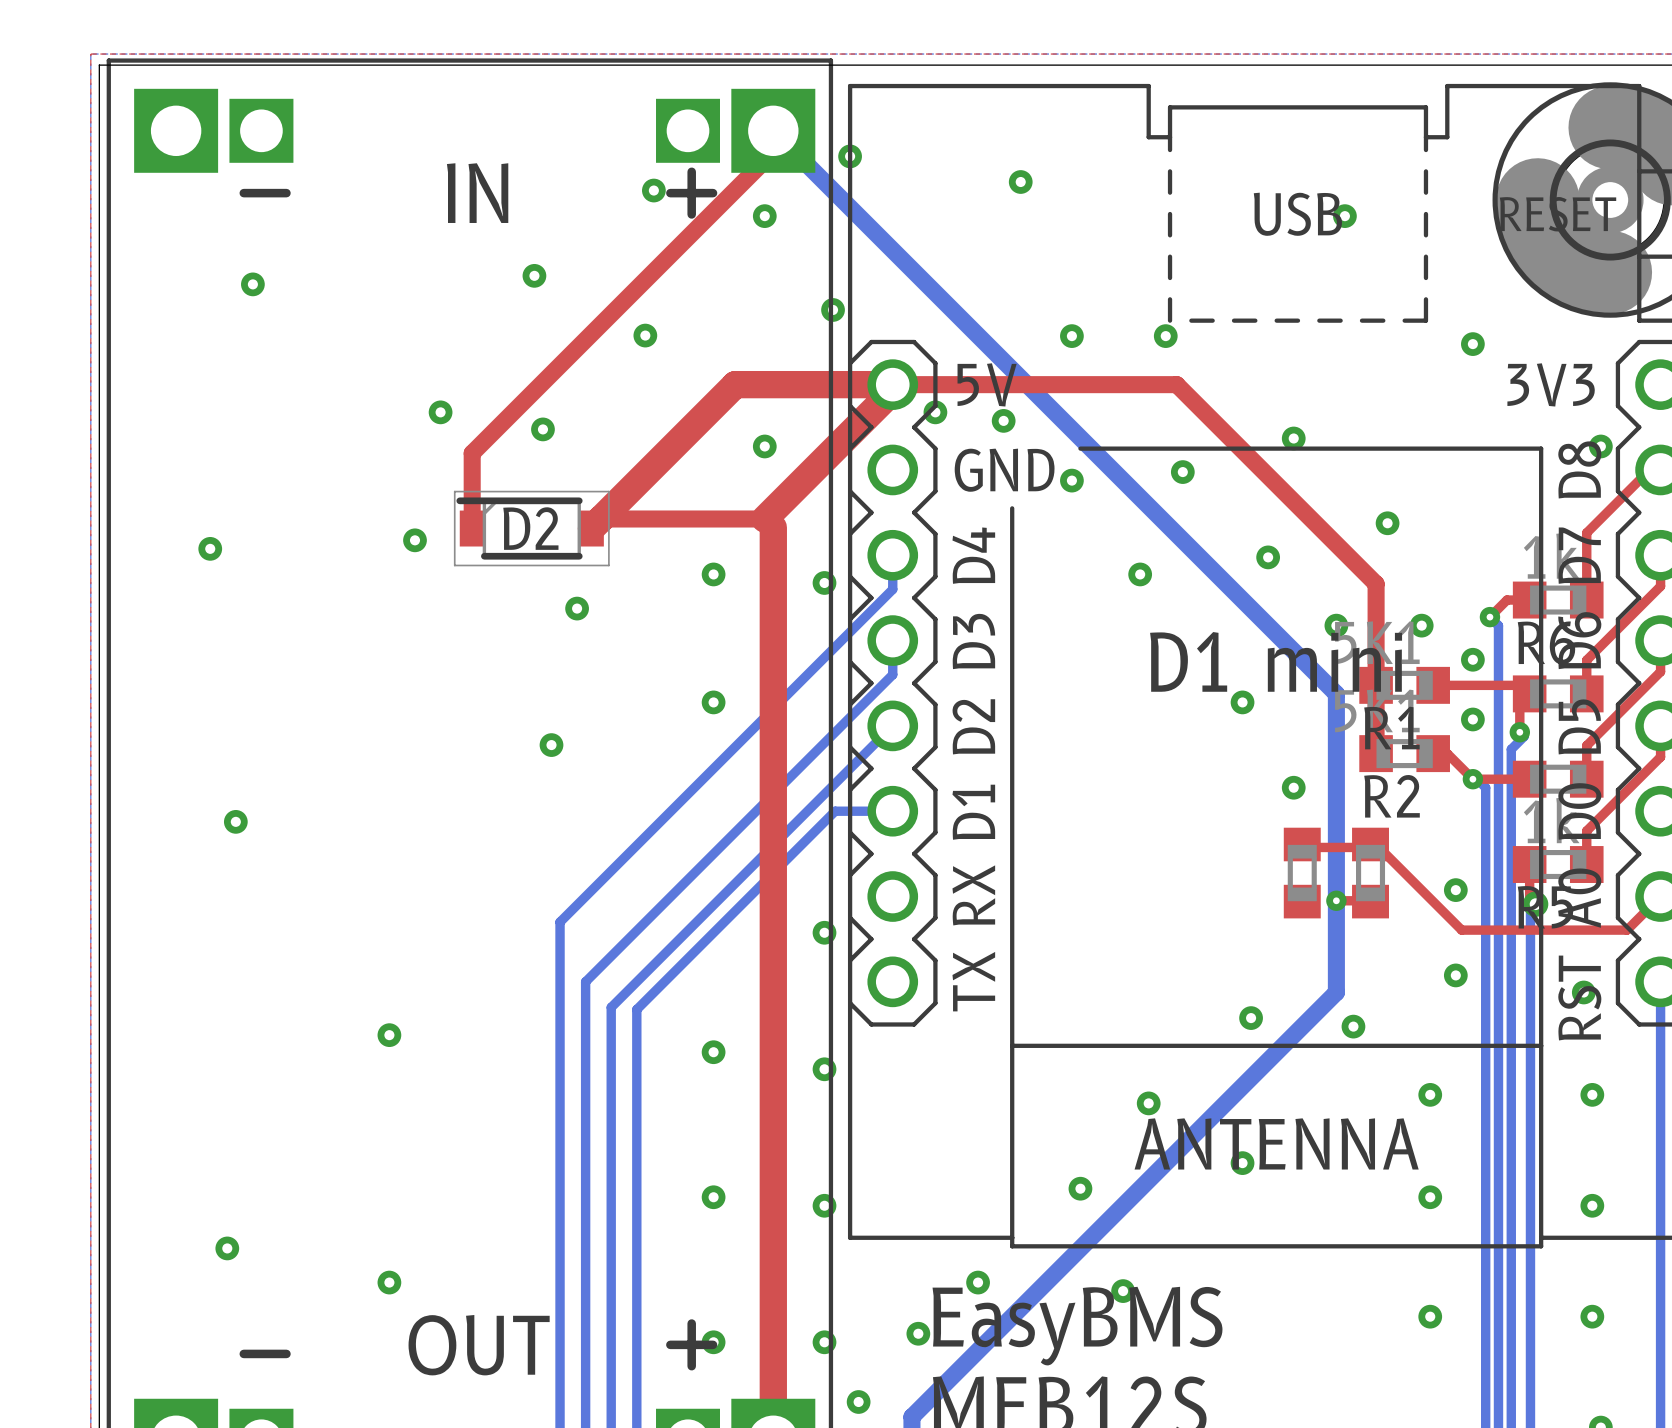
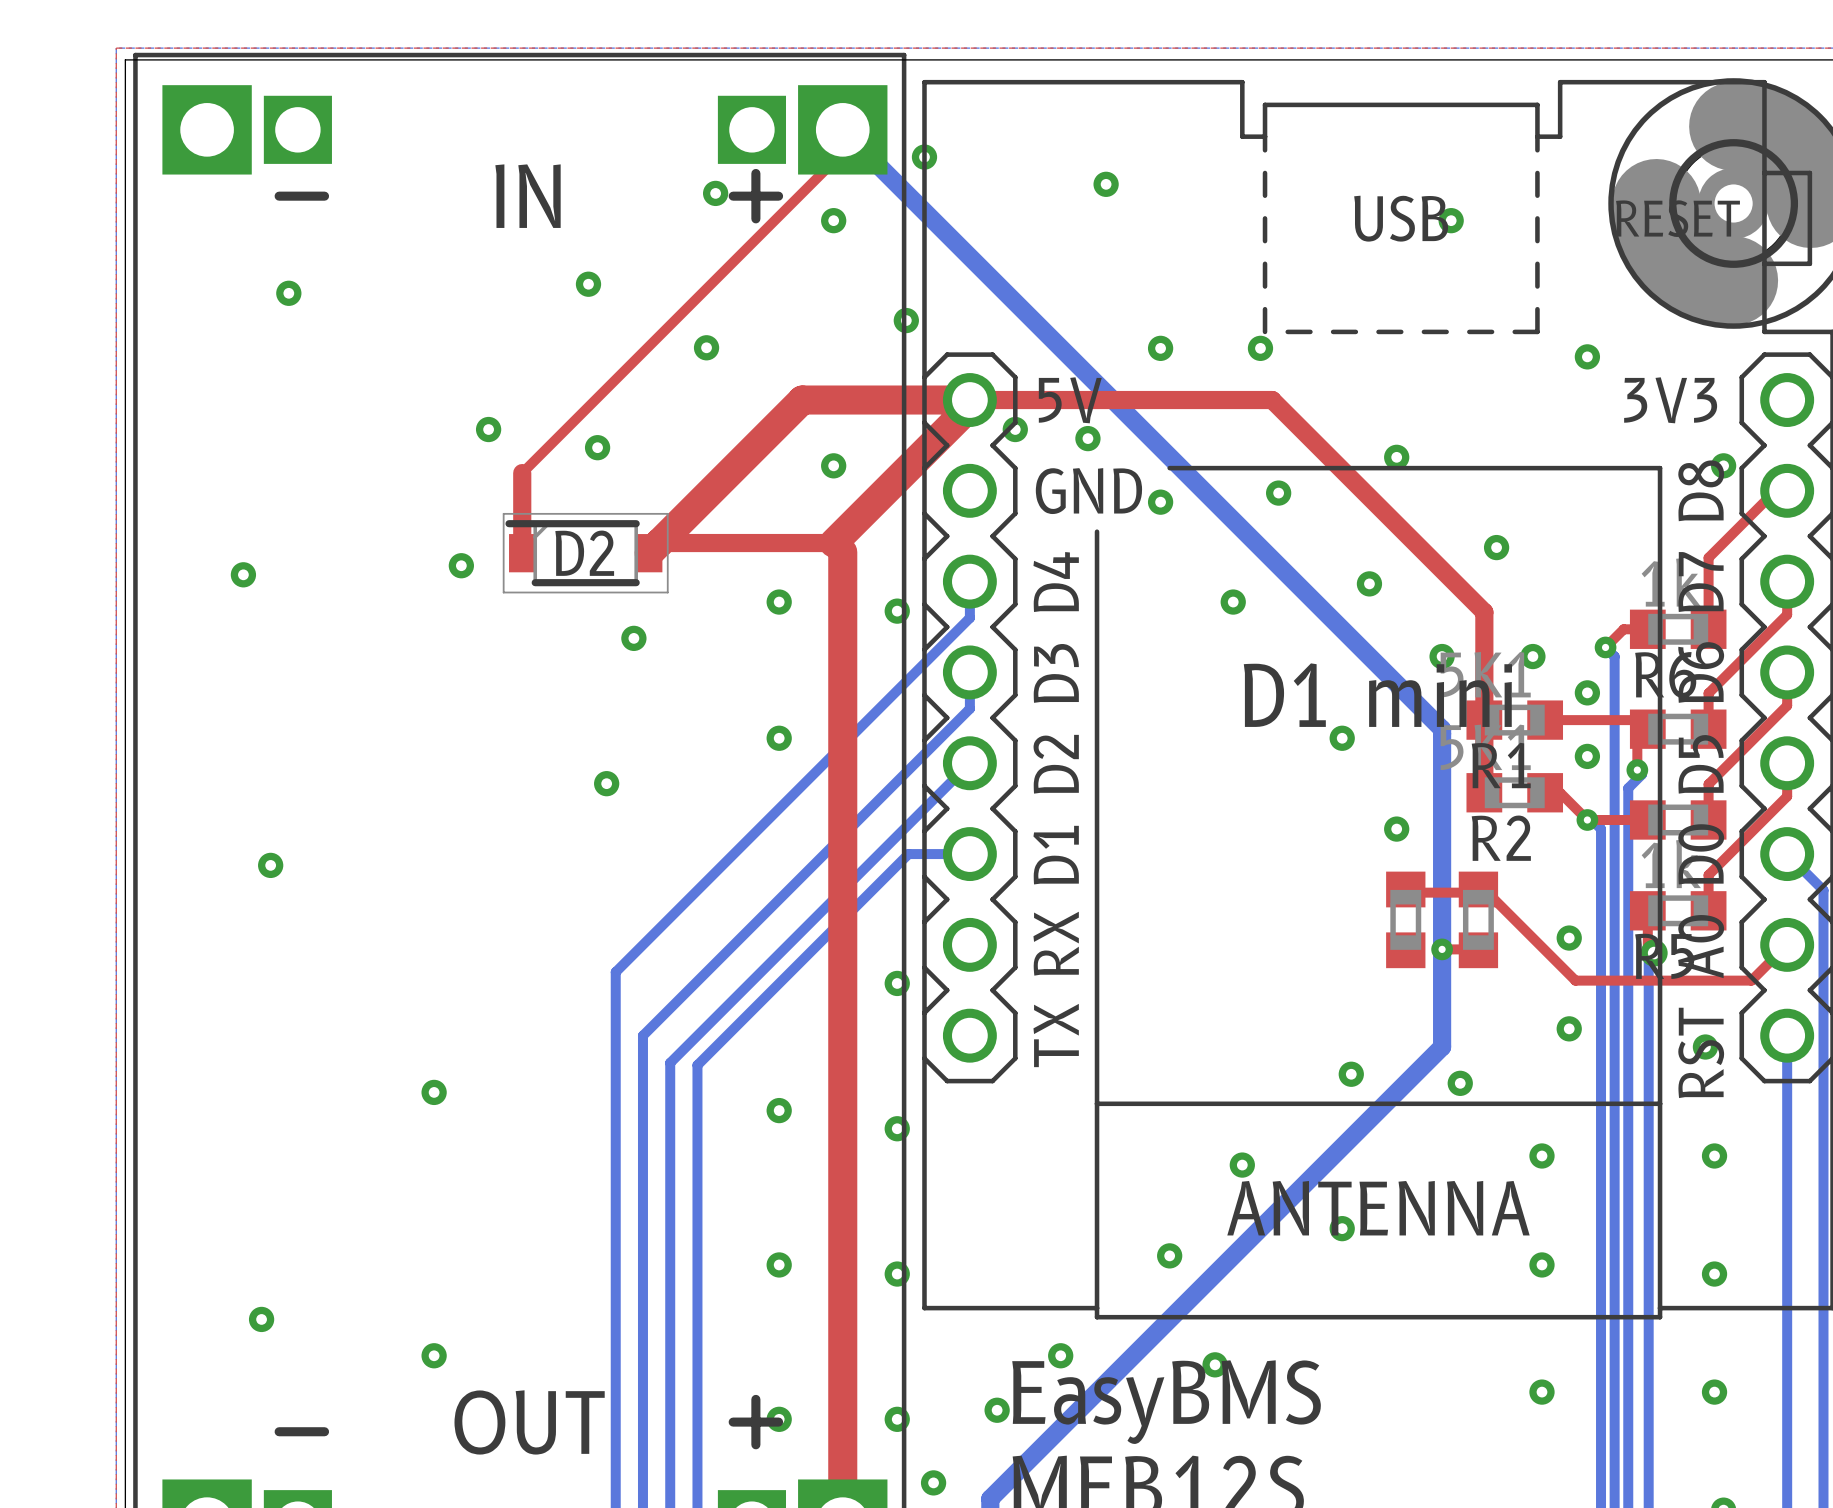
top track width: thick (771, 154) (472, 453) -> thin (840, 154) (522, 473)

